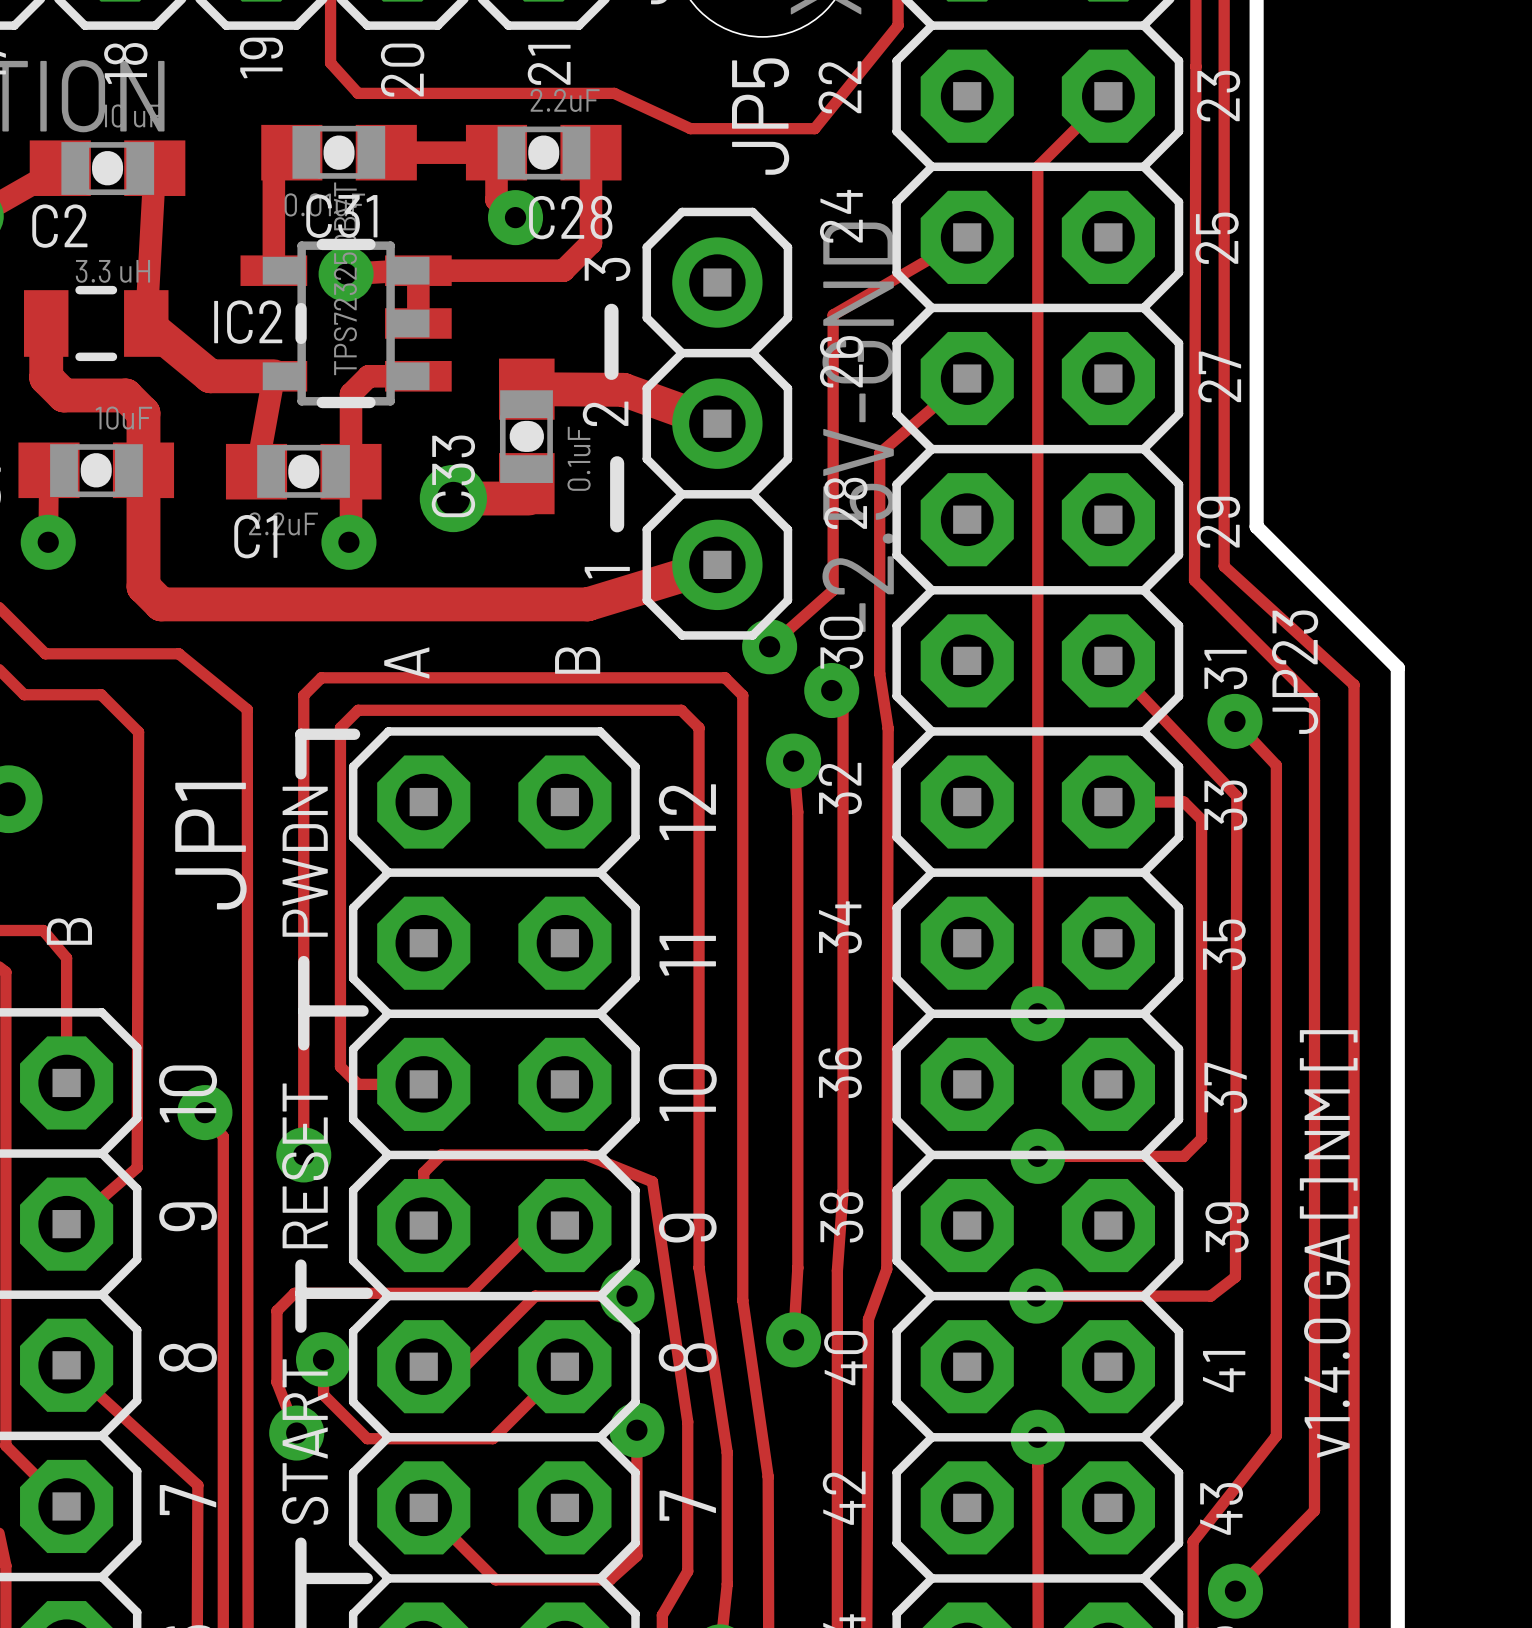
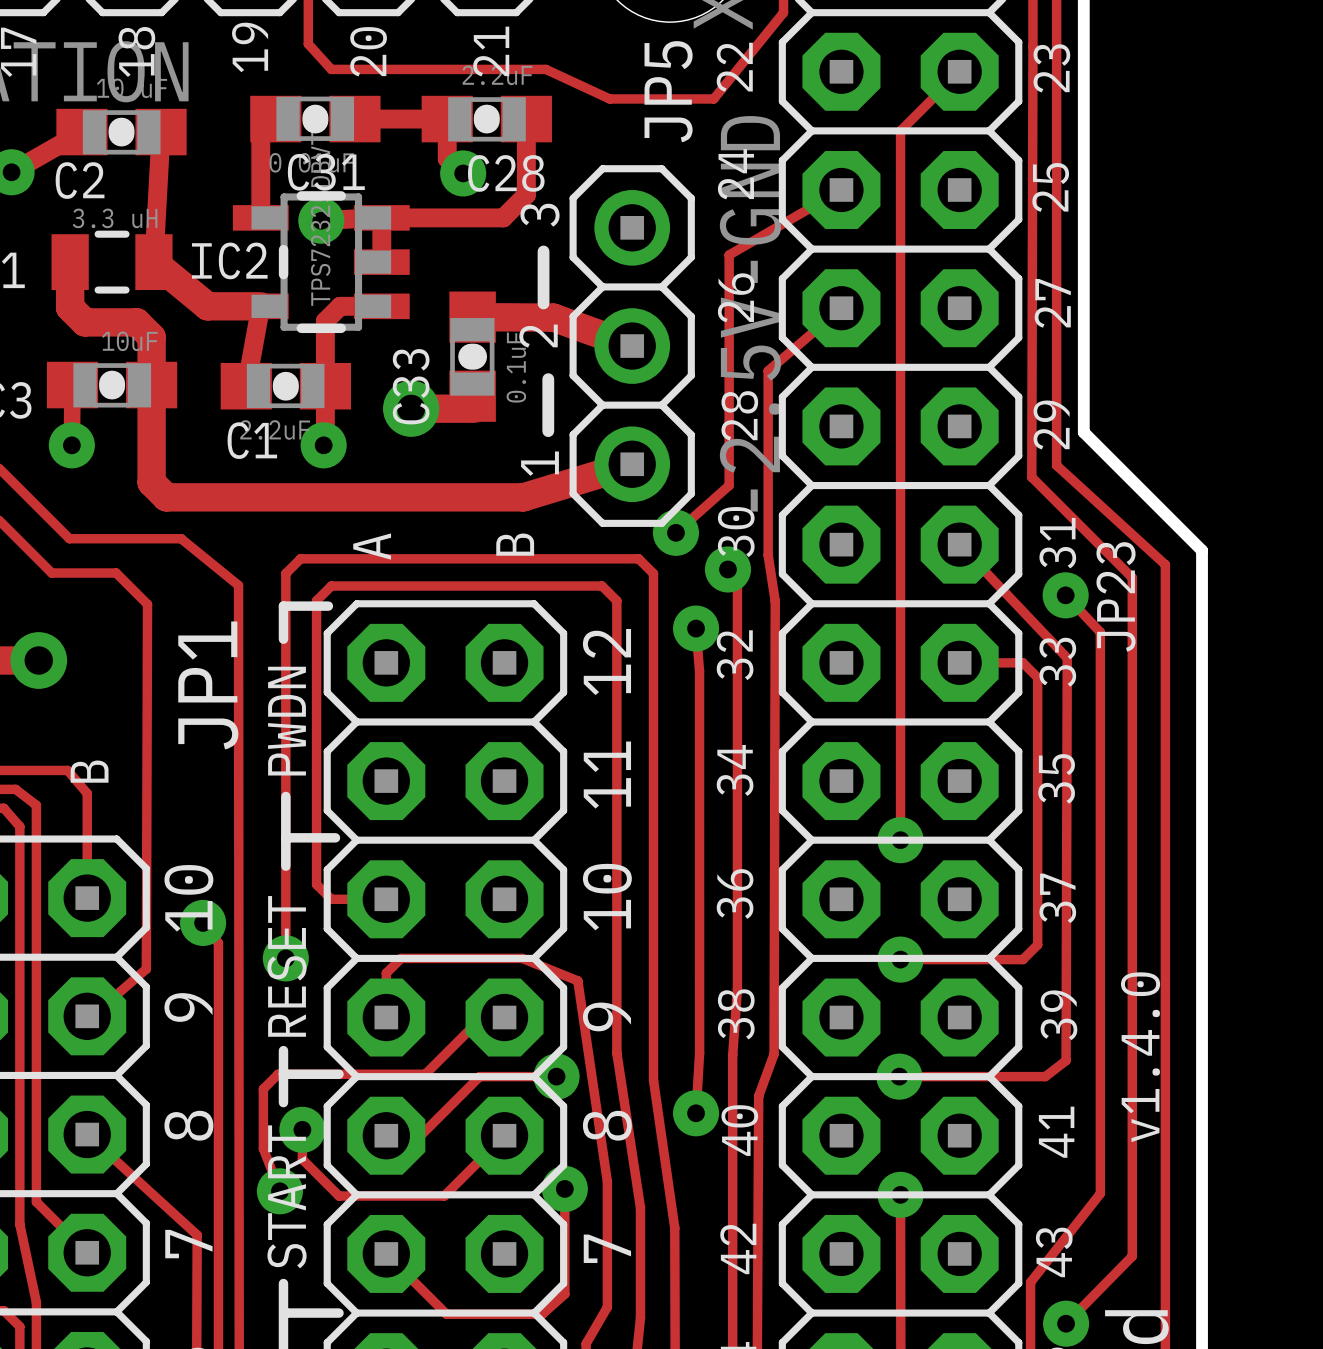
JP23 name position: JP23 (1295, 672) -> JP23 (1116, 596)
text: v1.4.0 GA [] NM [] (1328, 1243) -> none
text: none -> v1.4.0 (1140, 1057)

